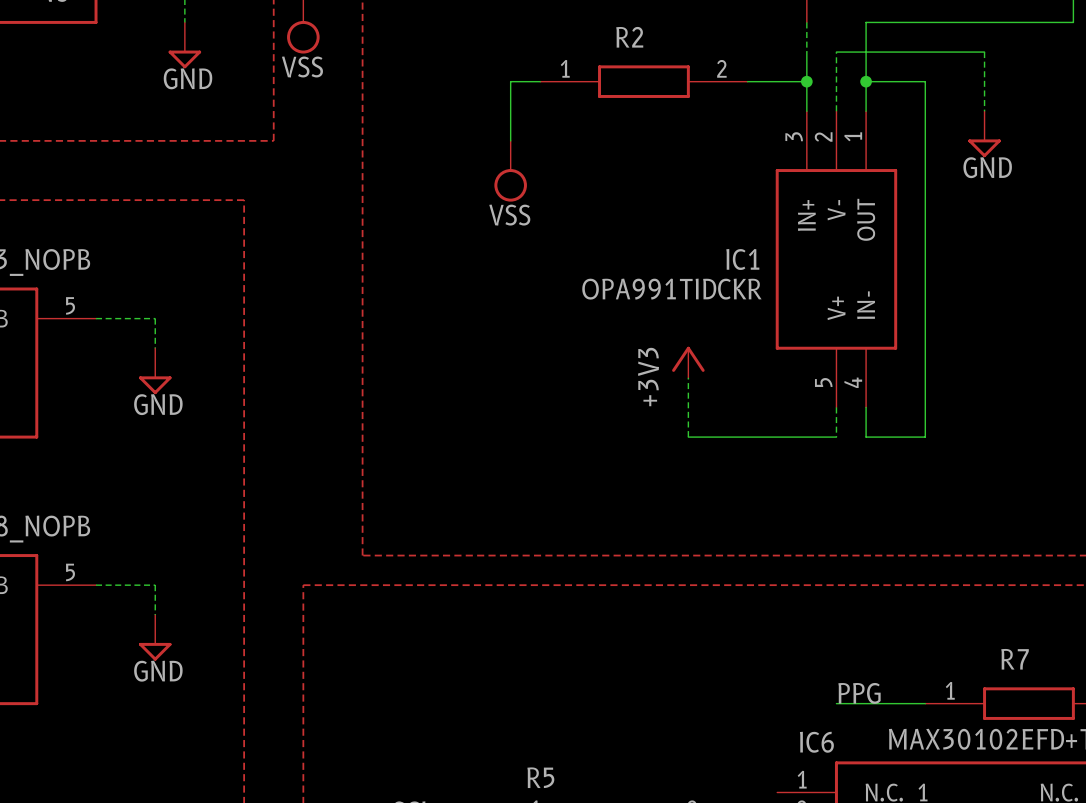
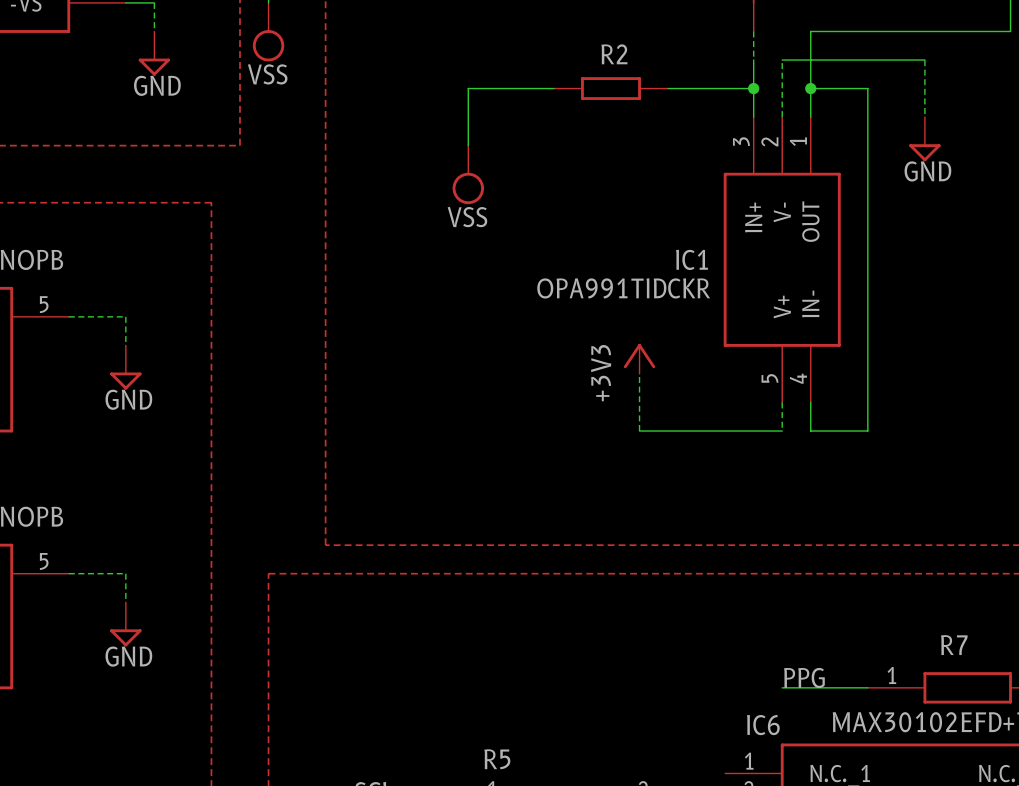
R2 symbol: [540, 65, 748, 98] -> [553, 77, 669, 100]

